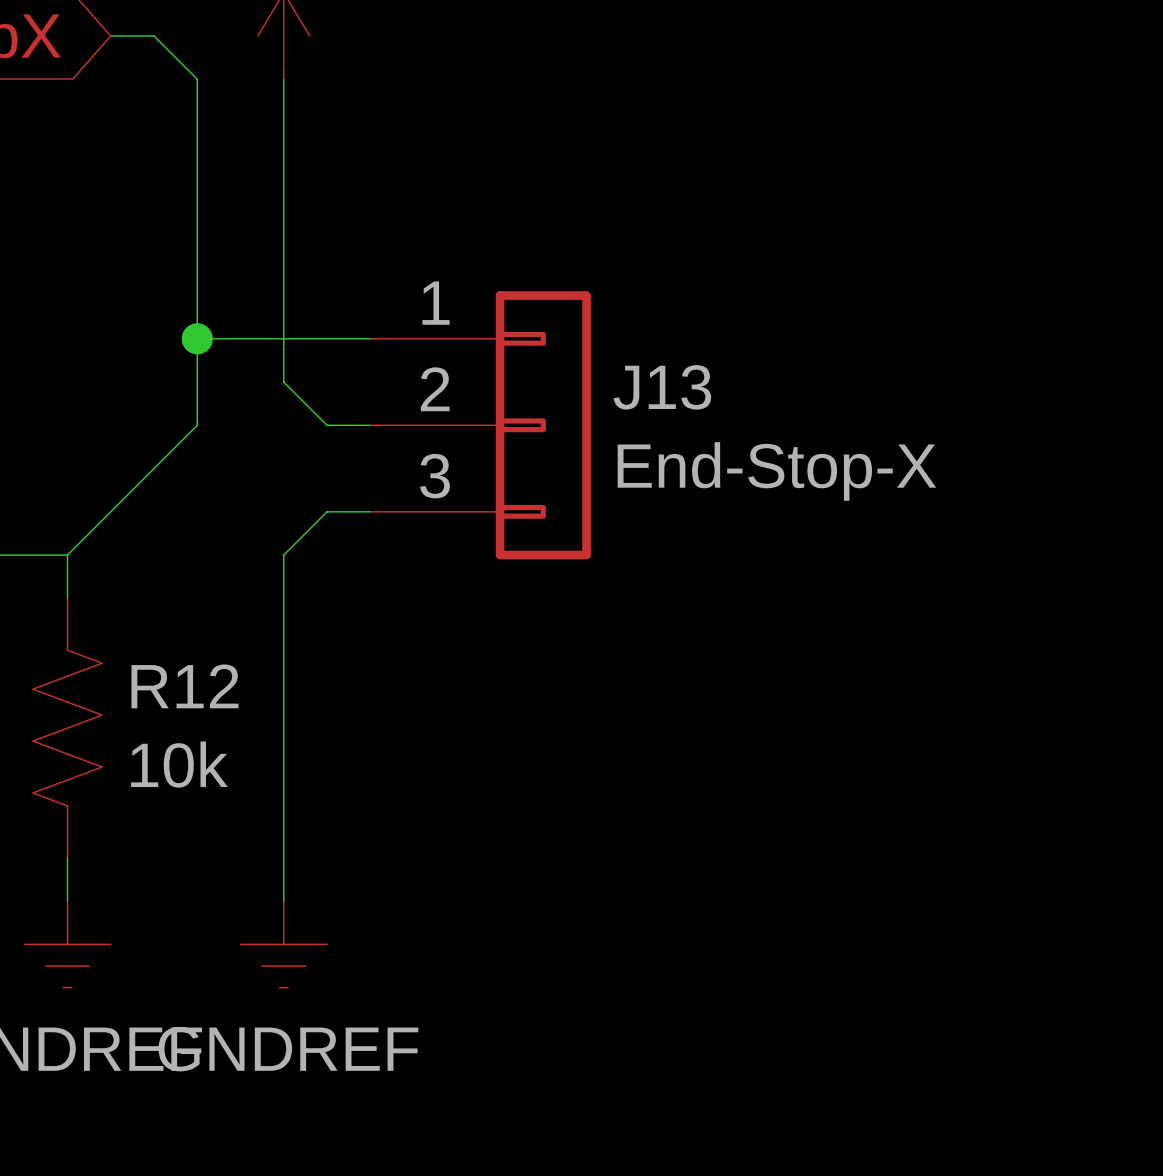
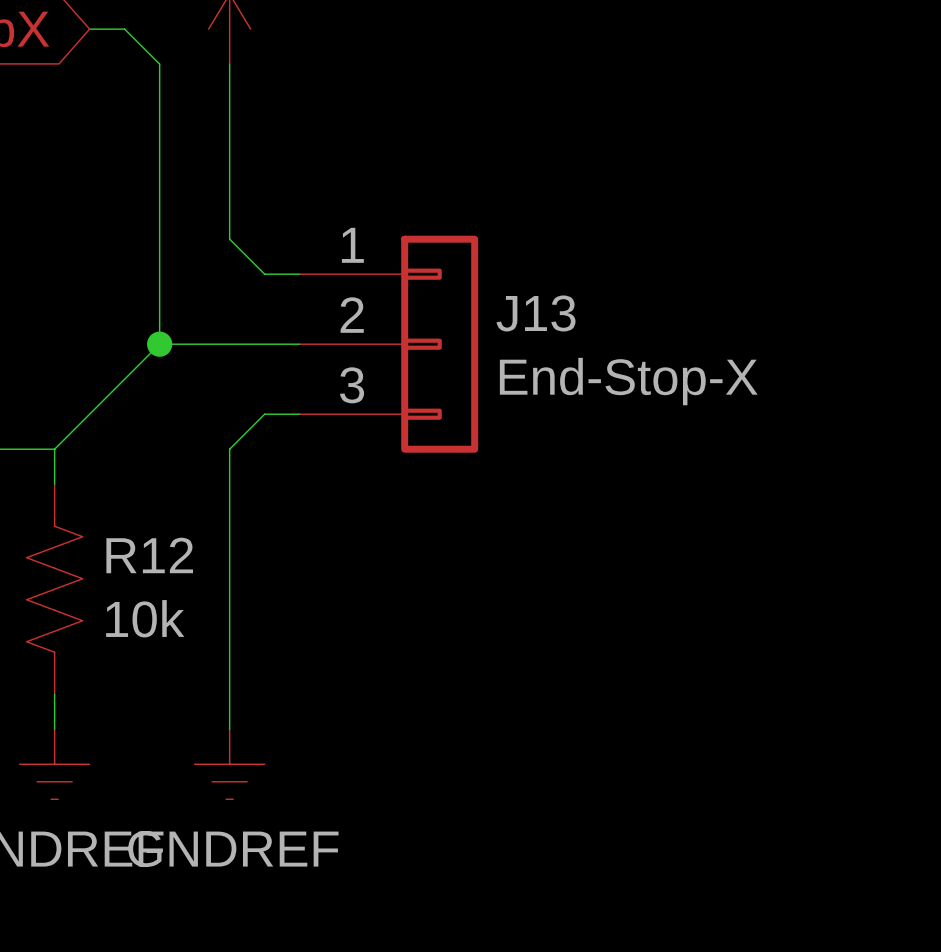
wire: (283, 295) (283, 382) (327, 425) -> (229, 239) (264, 274)
wire: (197, 338) (327, 338) -> (159, 344) (264, 344)
junction position: (197, 338) -> (159, 344)

